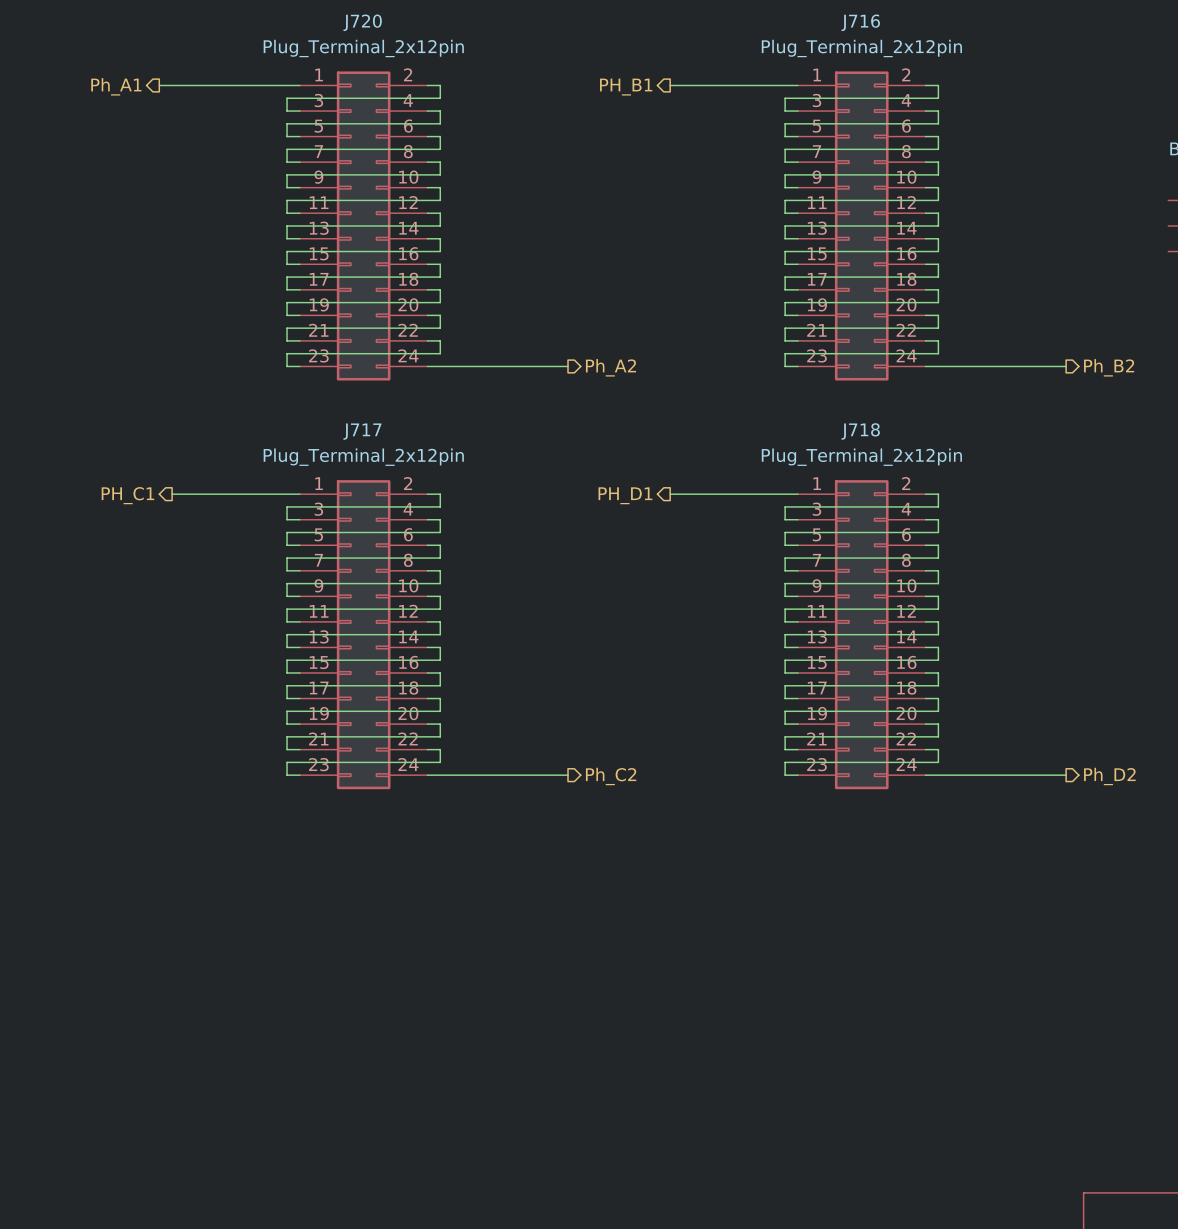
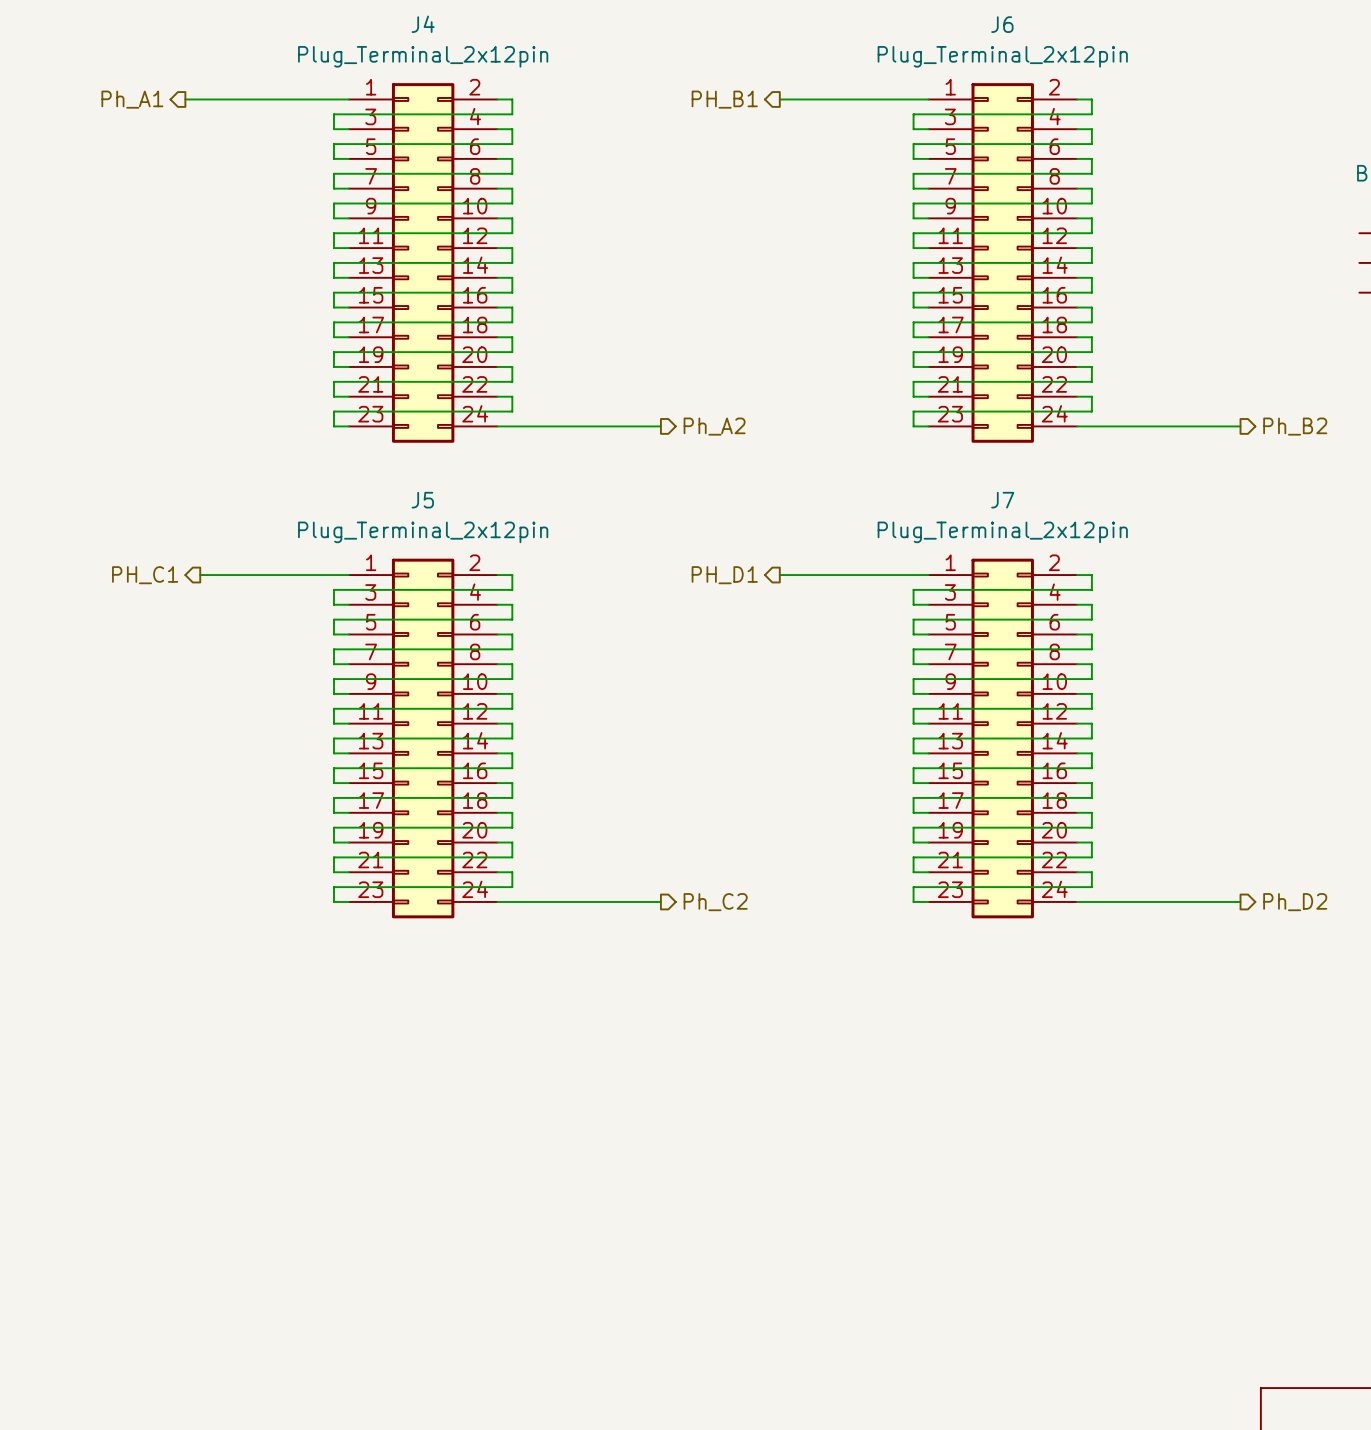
J720 name: J720 (362, 22) -> J4 (423, 24)
J716 name: J716 (860, 22) -> J6 (1002, 24)
J717 name: J717 (362, 431) -> J5 (422, 500)
J718 name: J718 (860, 431) -> J7 (1002, 500)

